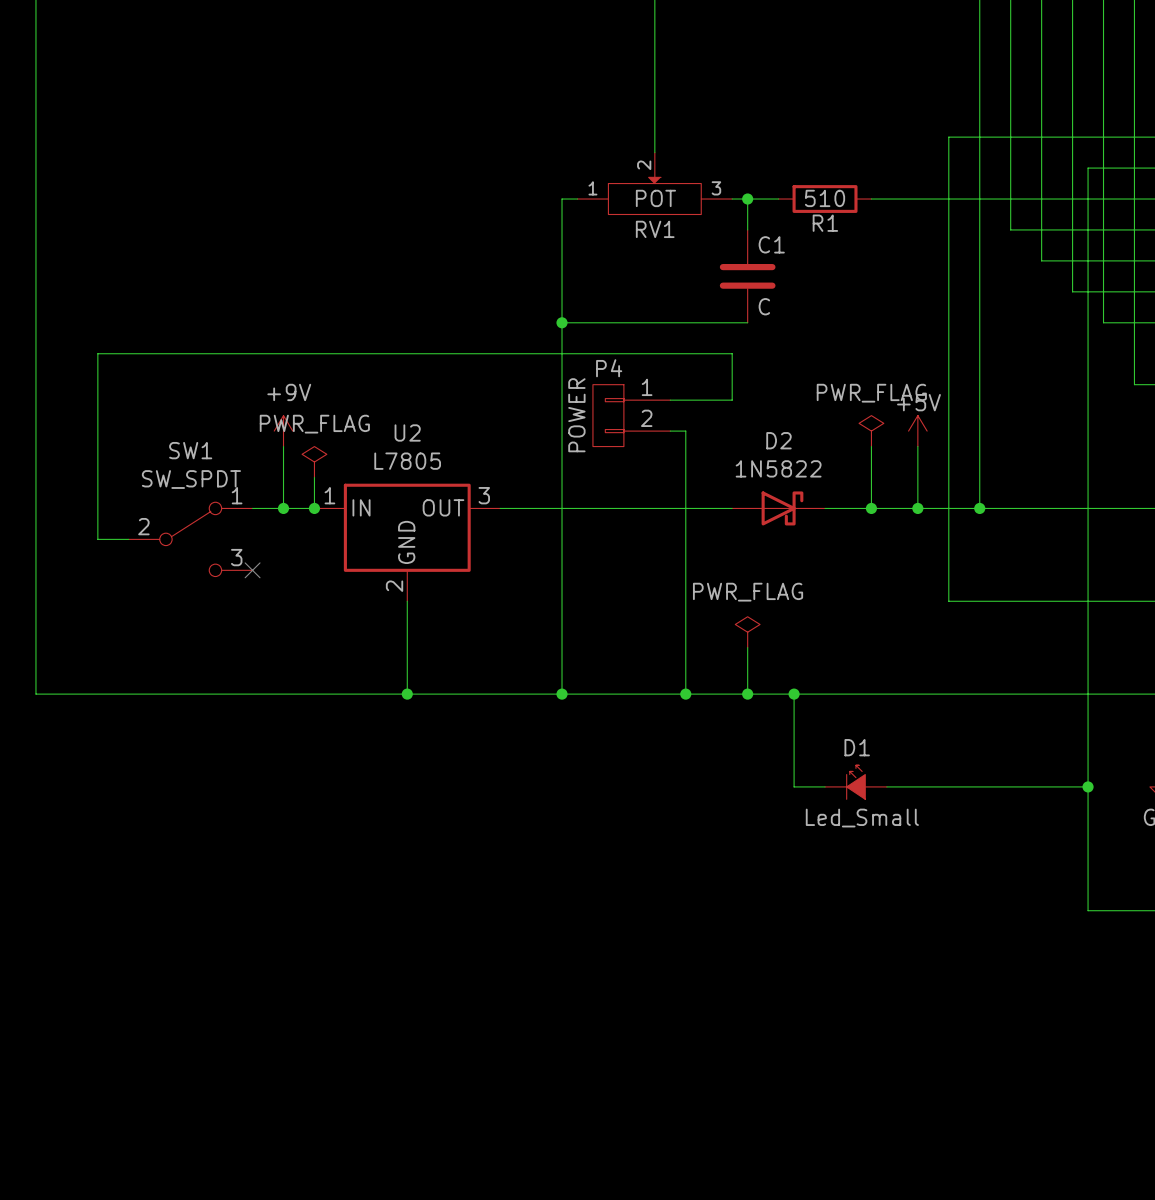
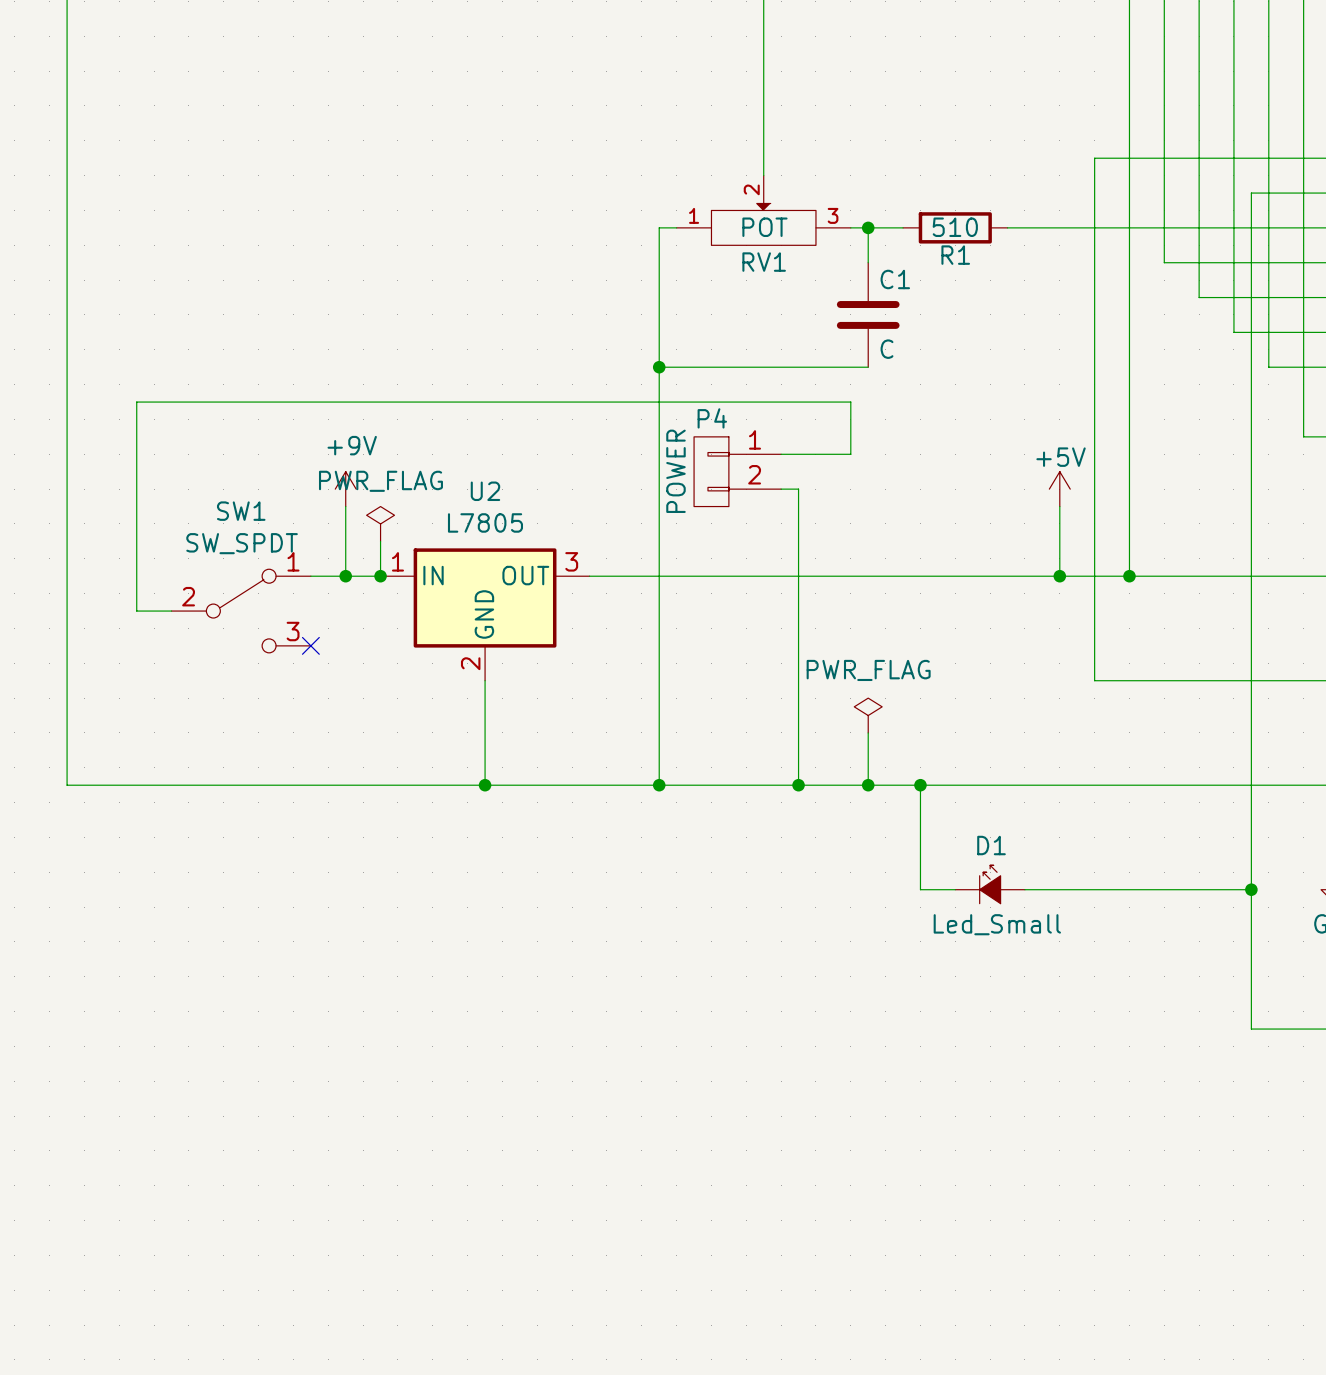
power symbol: PWR_FLAG (871, 431) -> none
wire: (871, 446) (871, 508) -> none
D2: 1N5822 (778, 508) -> none
junction: (871, 508) -> none

